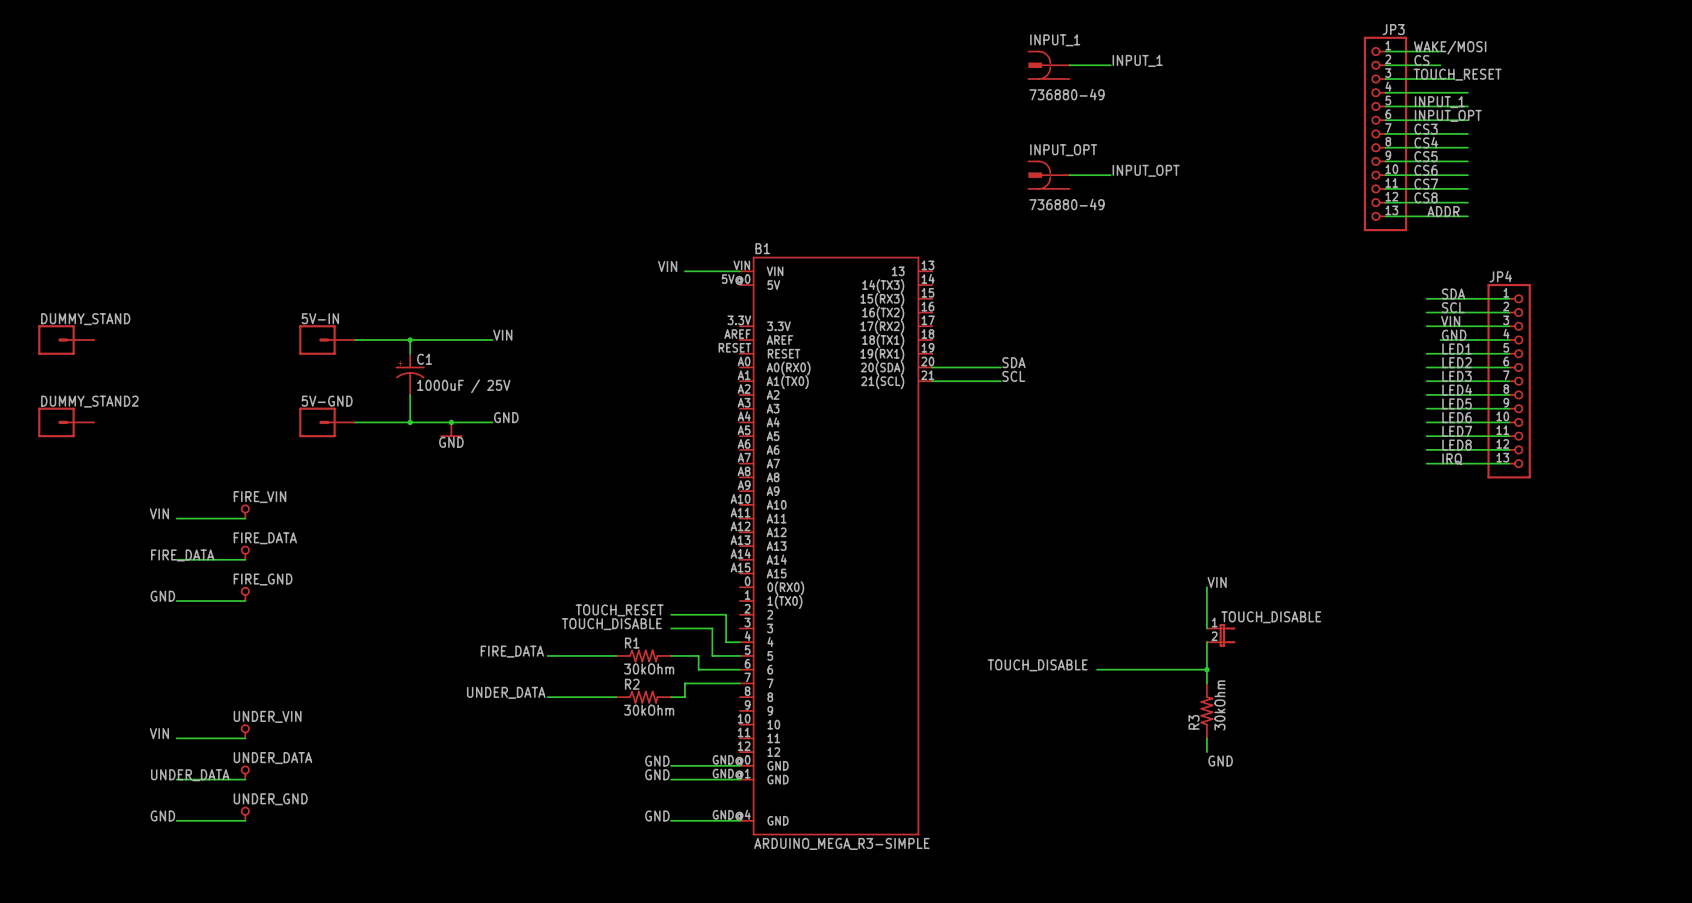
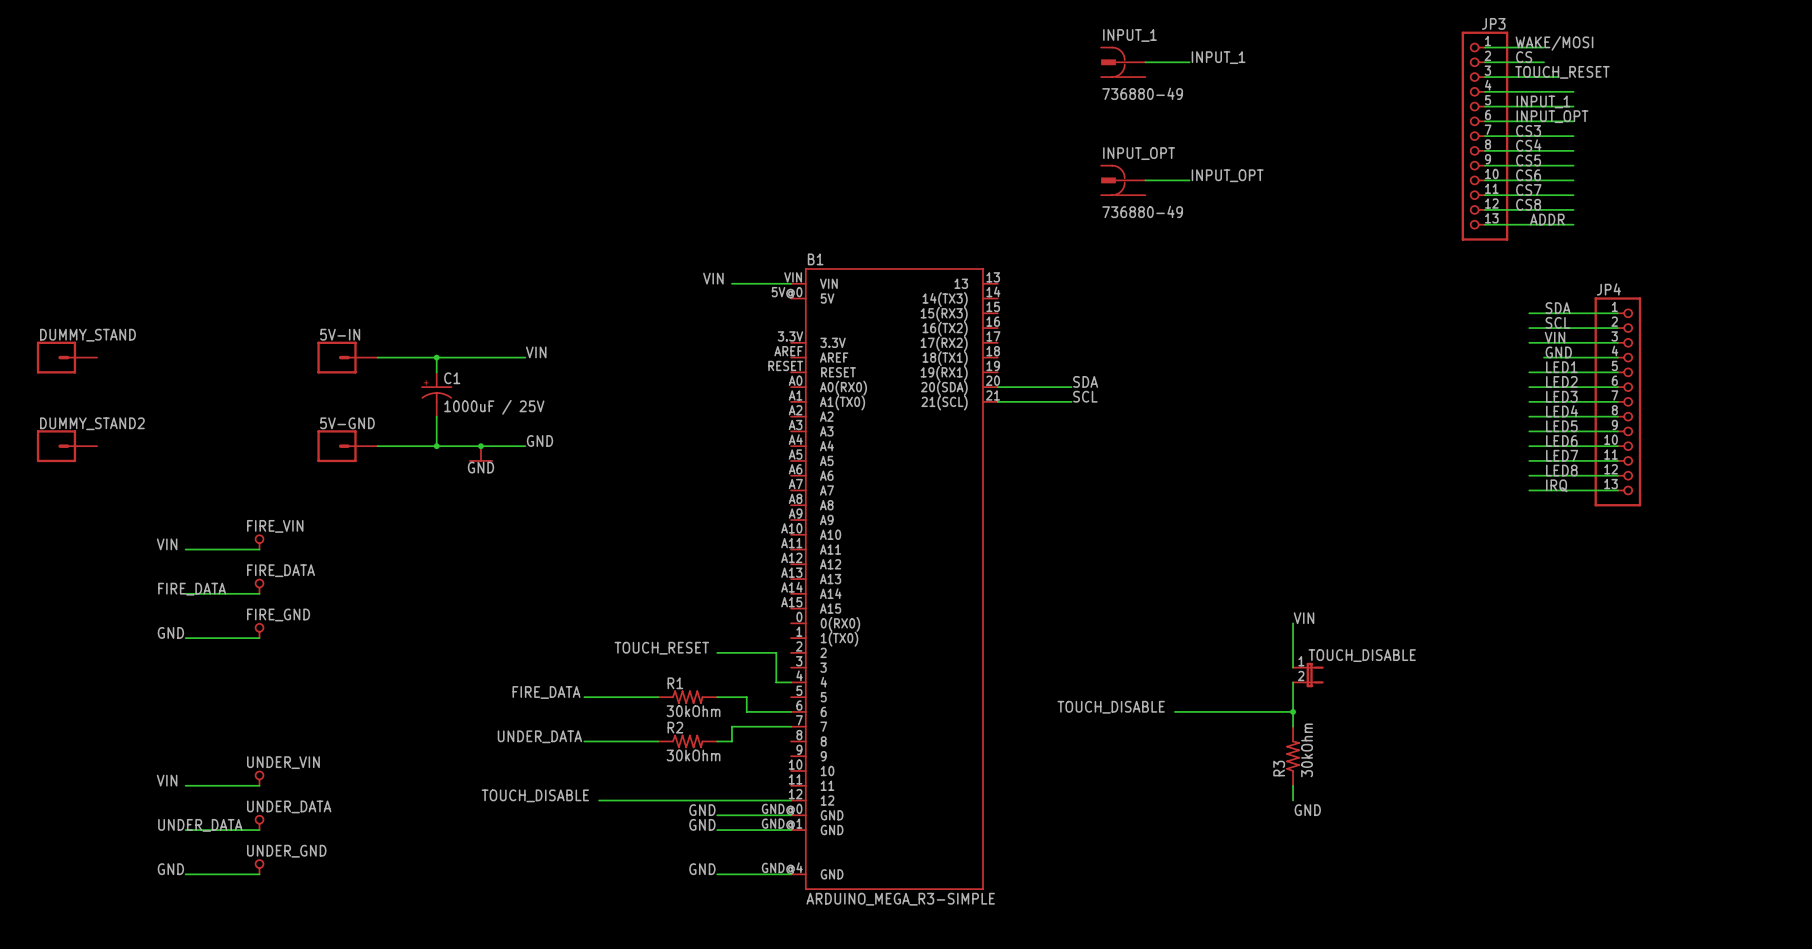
label: TOUCH_DISABLE (611, 624) -> none
wire: (671, 628) (712, 628) (712, 655) (739, 655) -> none
label: none -> TOUCH_DISABLE (535, 795)
wire: none -> (599, 800) (791, 800)

